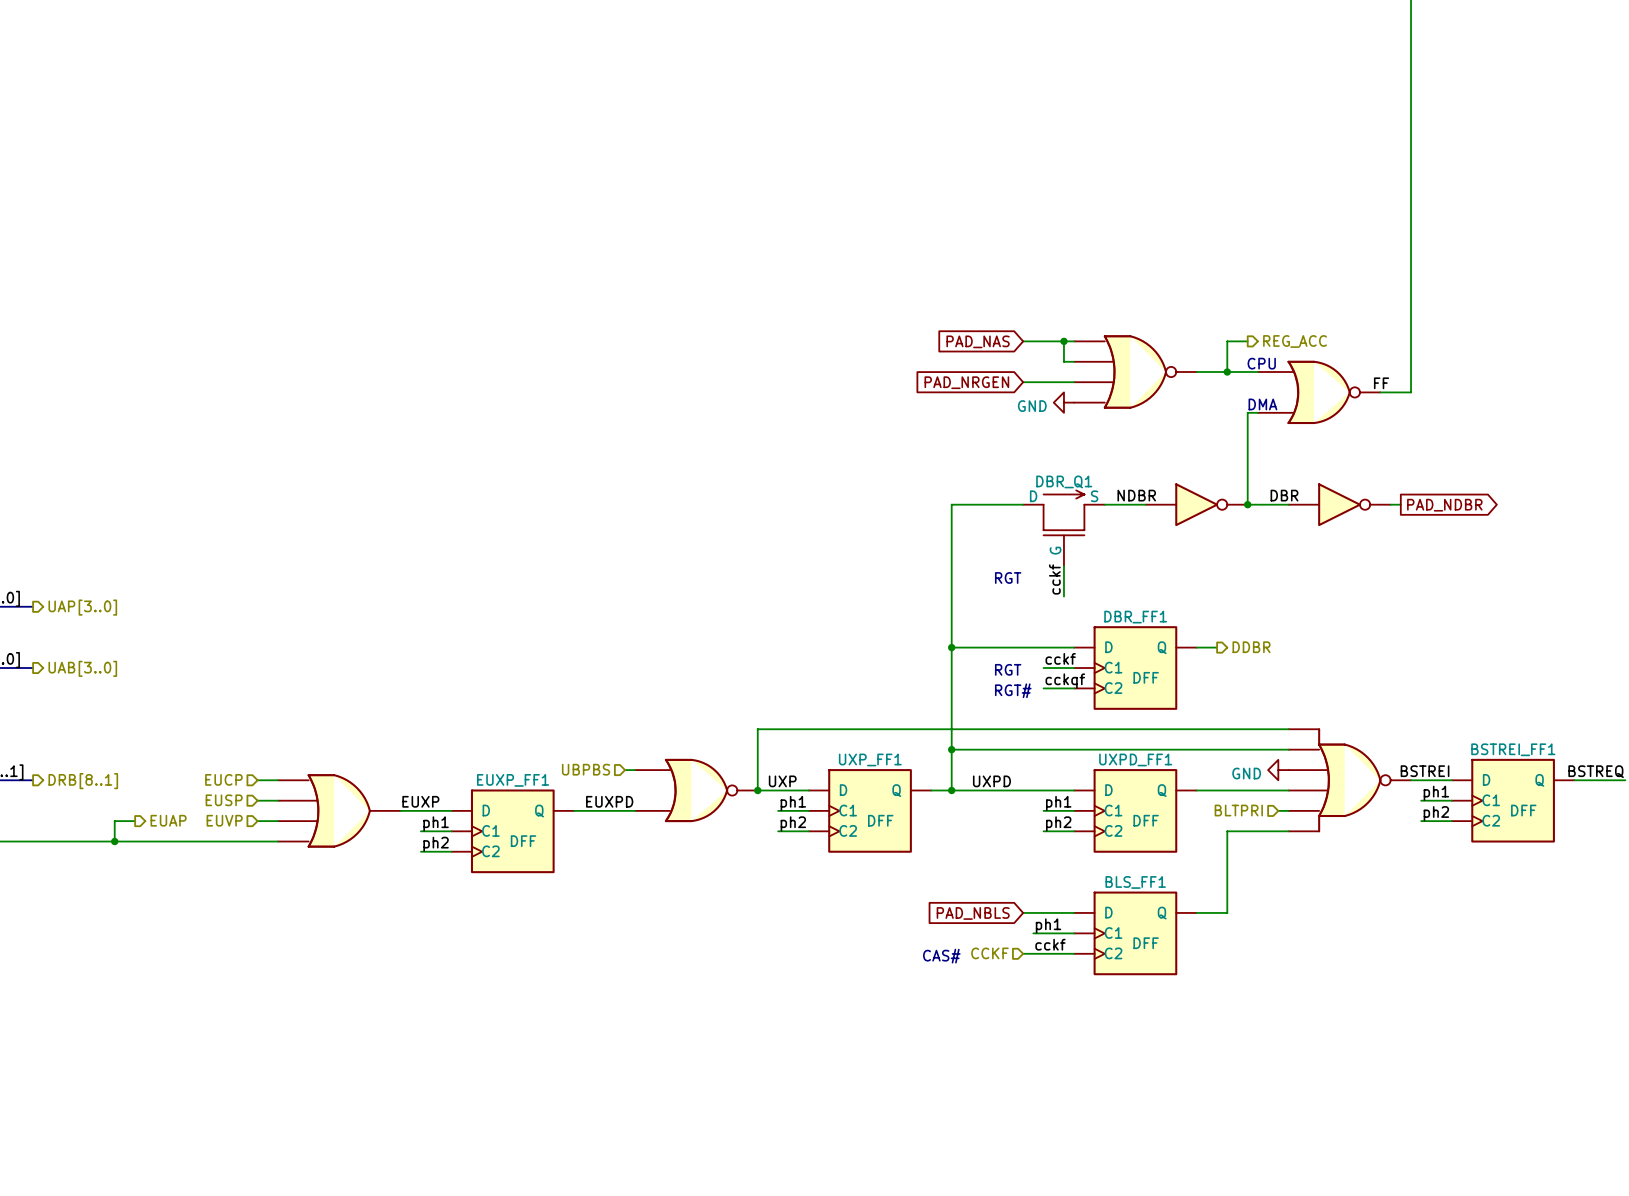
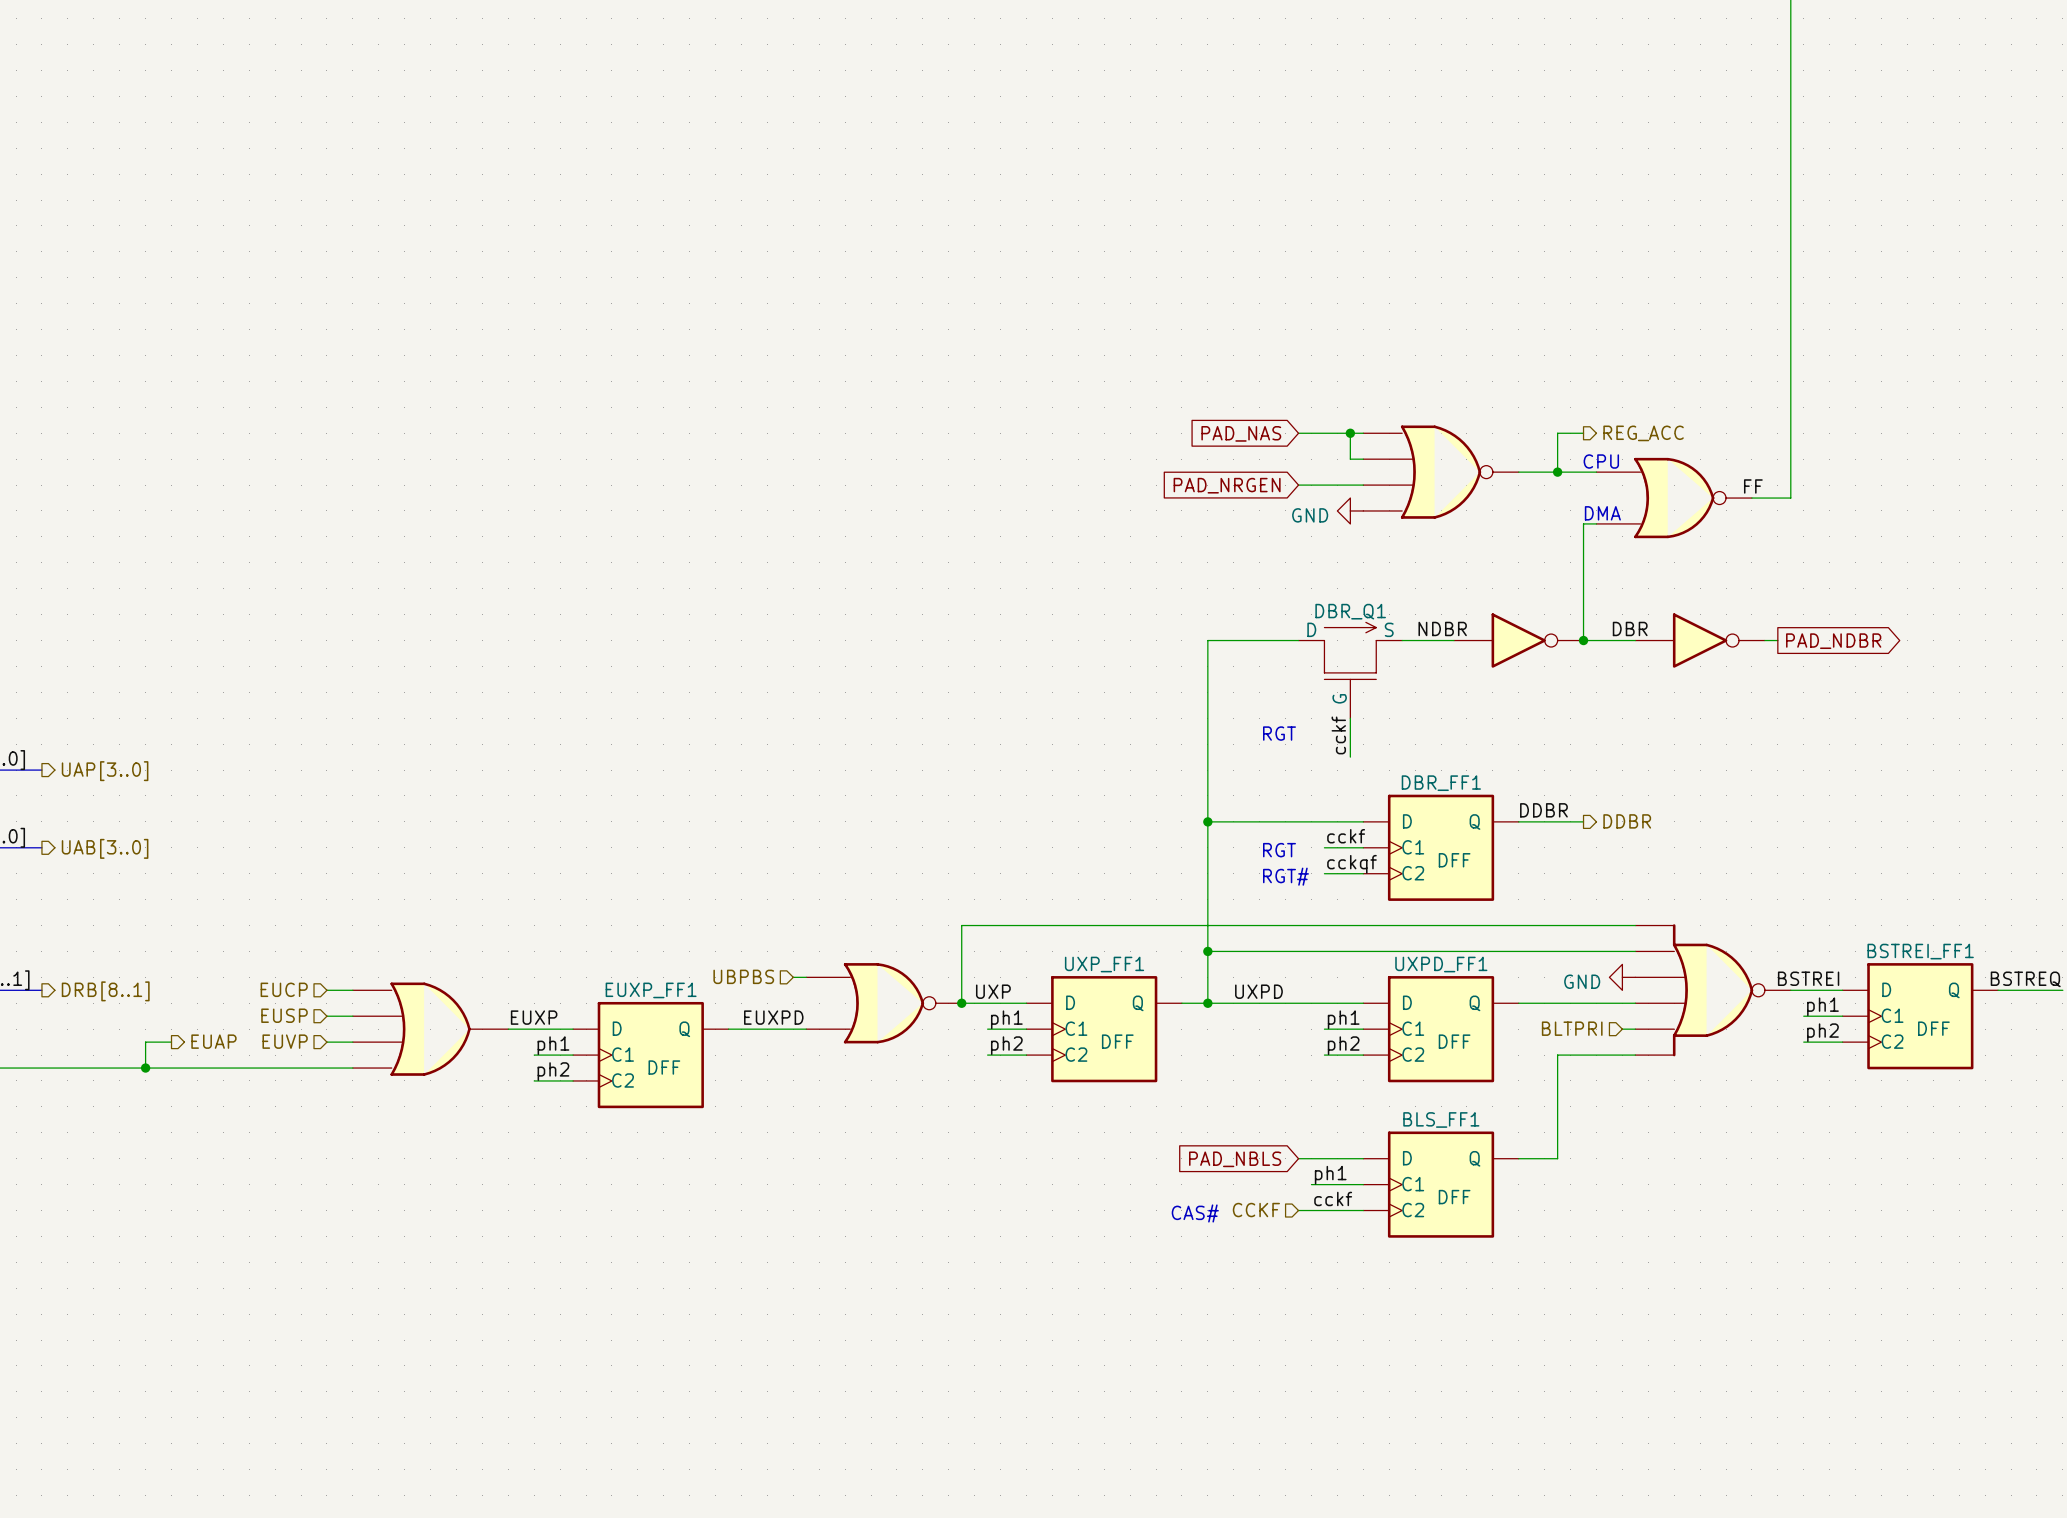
label: none -> DDBR (1543, 810)
wire: none -> (1544, 821) (1583, 821)
hierarchical label position: DDBR (1251, 647) -> DDBR (1627, 821)

